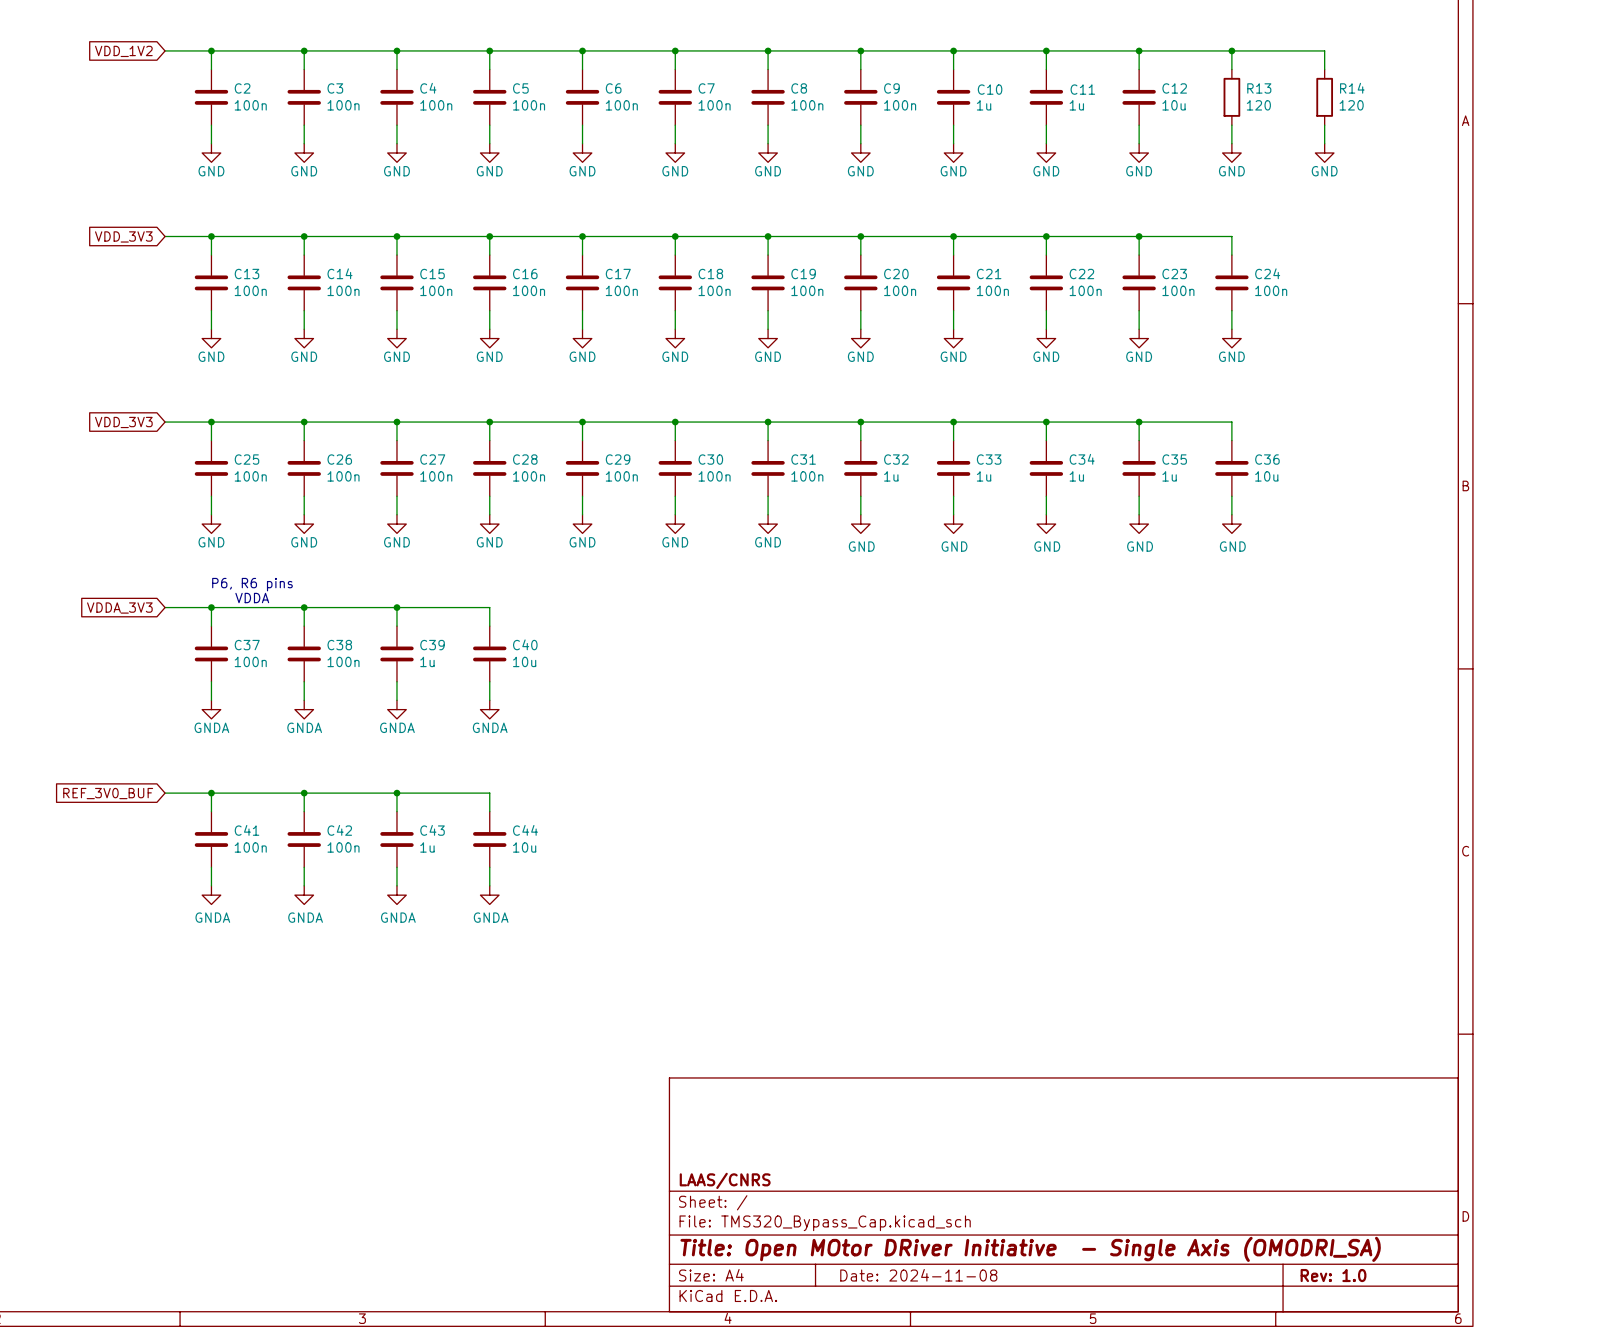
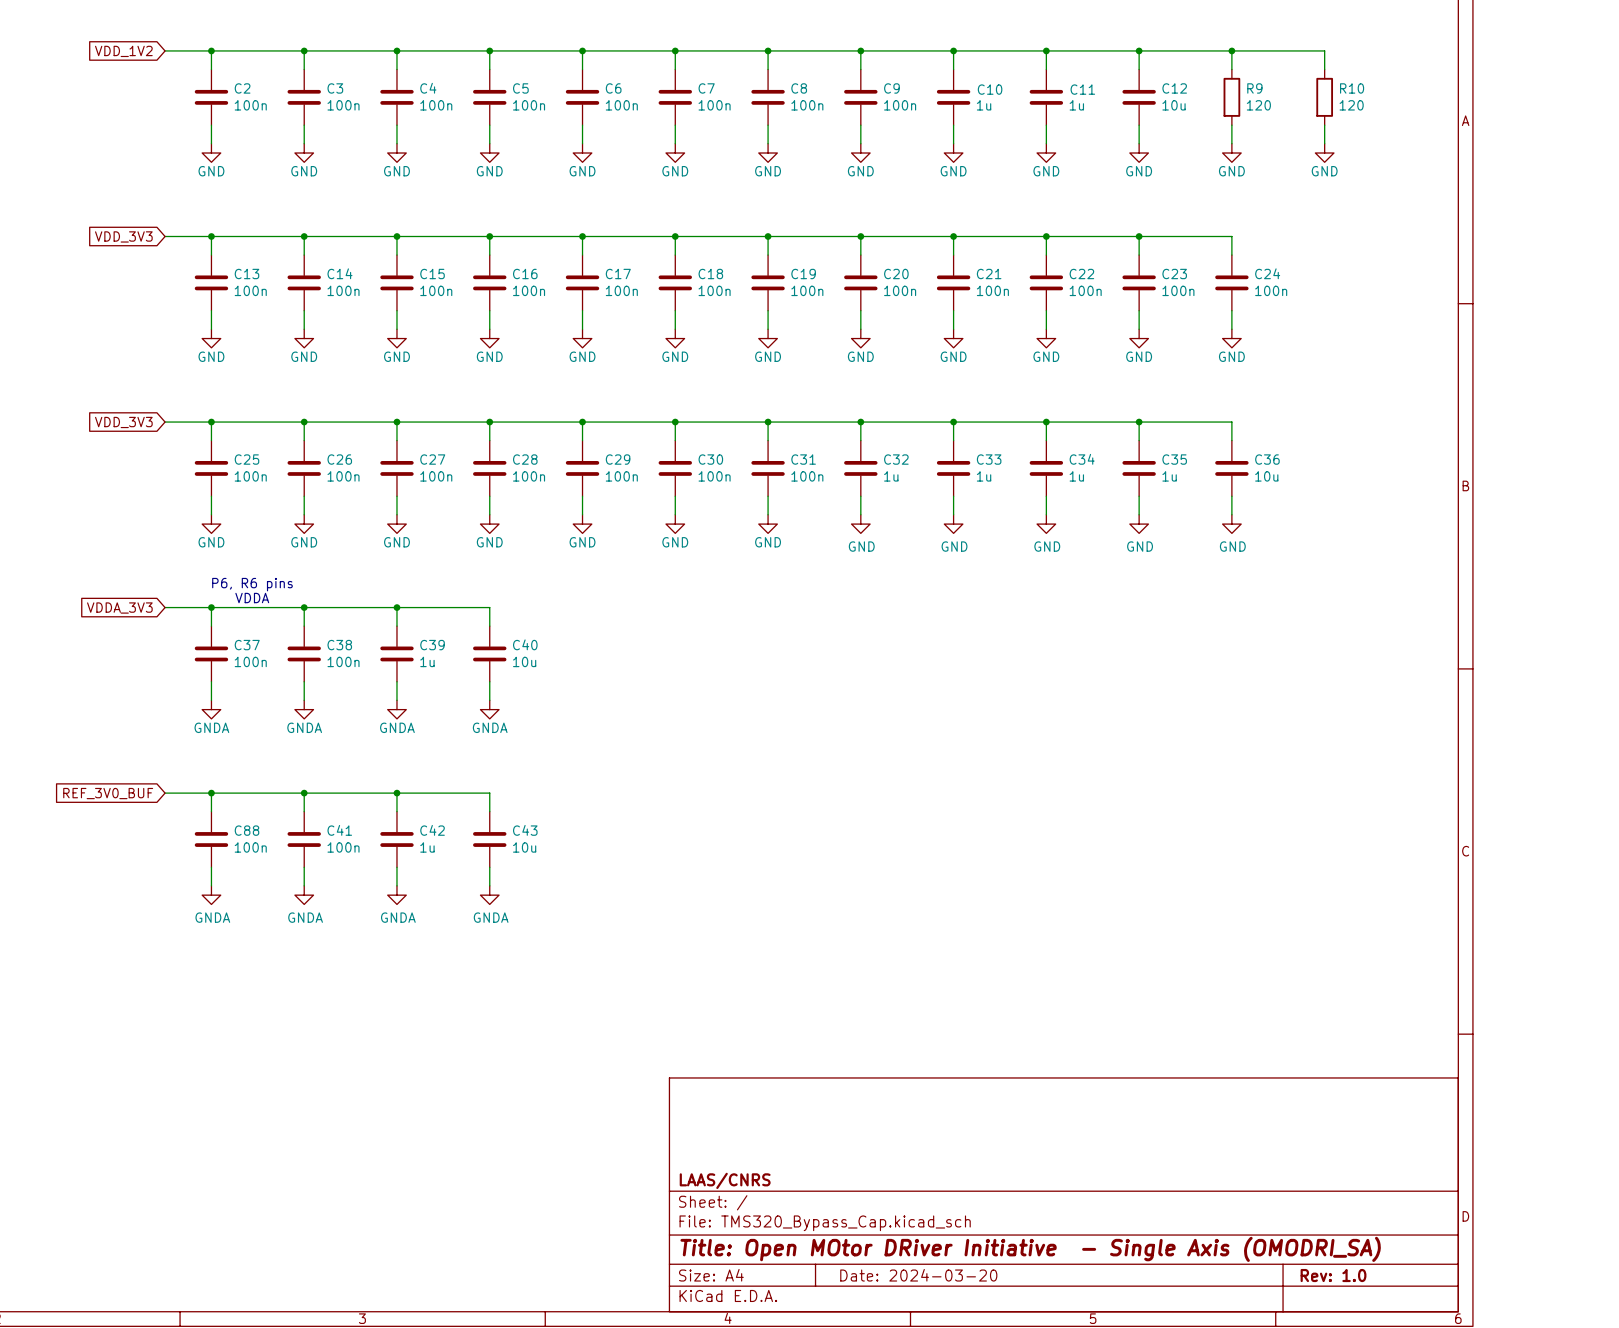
R13 name: R13 (1259, 88) -> R9 (1254, 88)
R14 name: R14 (1352, 88) -> R10 (1352, 88)
C41 name: C41 (246, 830) -> C88 (246, 830)
C42 name: C42 (339, 830) -> C41 (339, 830)
C43 name: C43 (432, 830) -> C42 (432, 830)
C44 name: C44 (525, 830) -> C43 (525, 830)
title block: Date: 2024-11-08 (918, 1275) -> Date: 2024-03-20 (918, 1275)

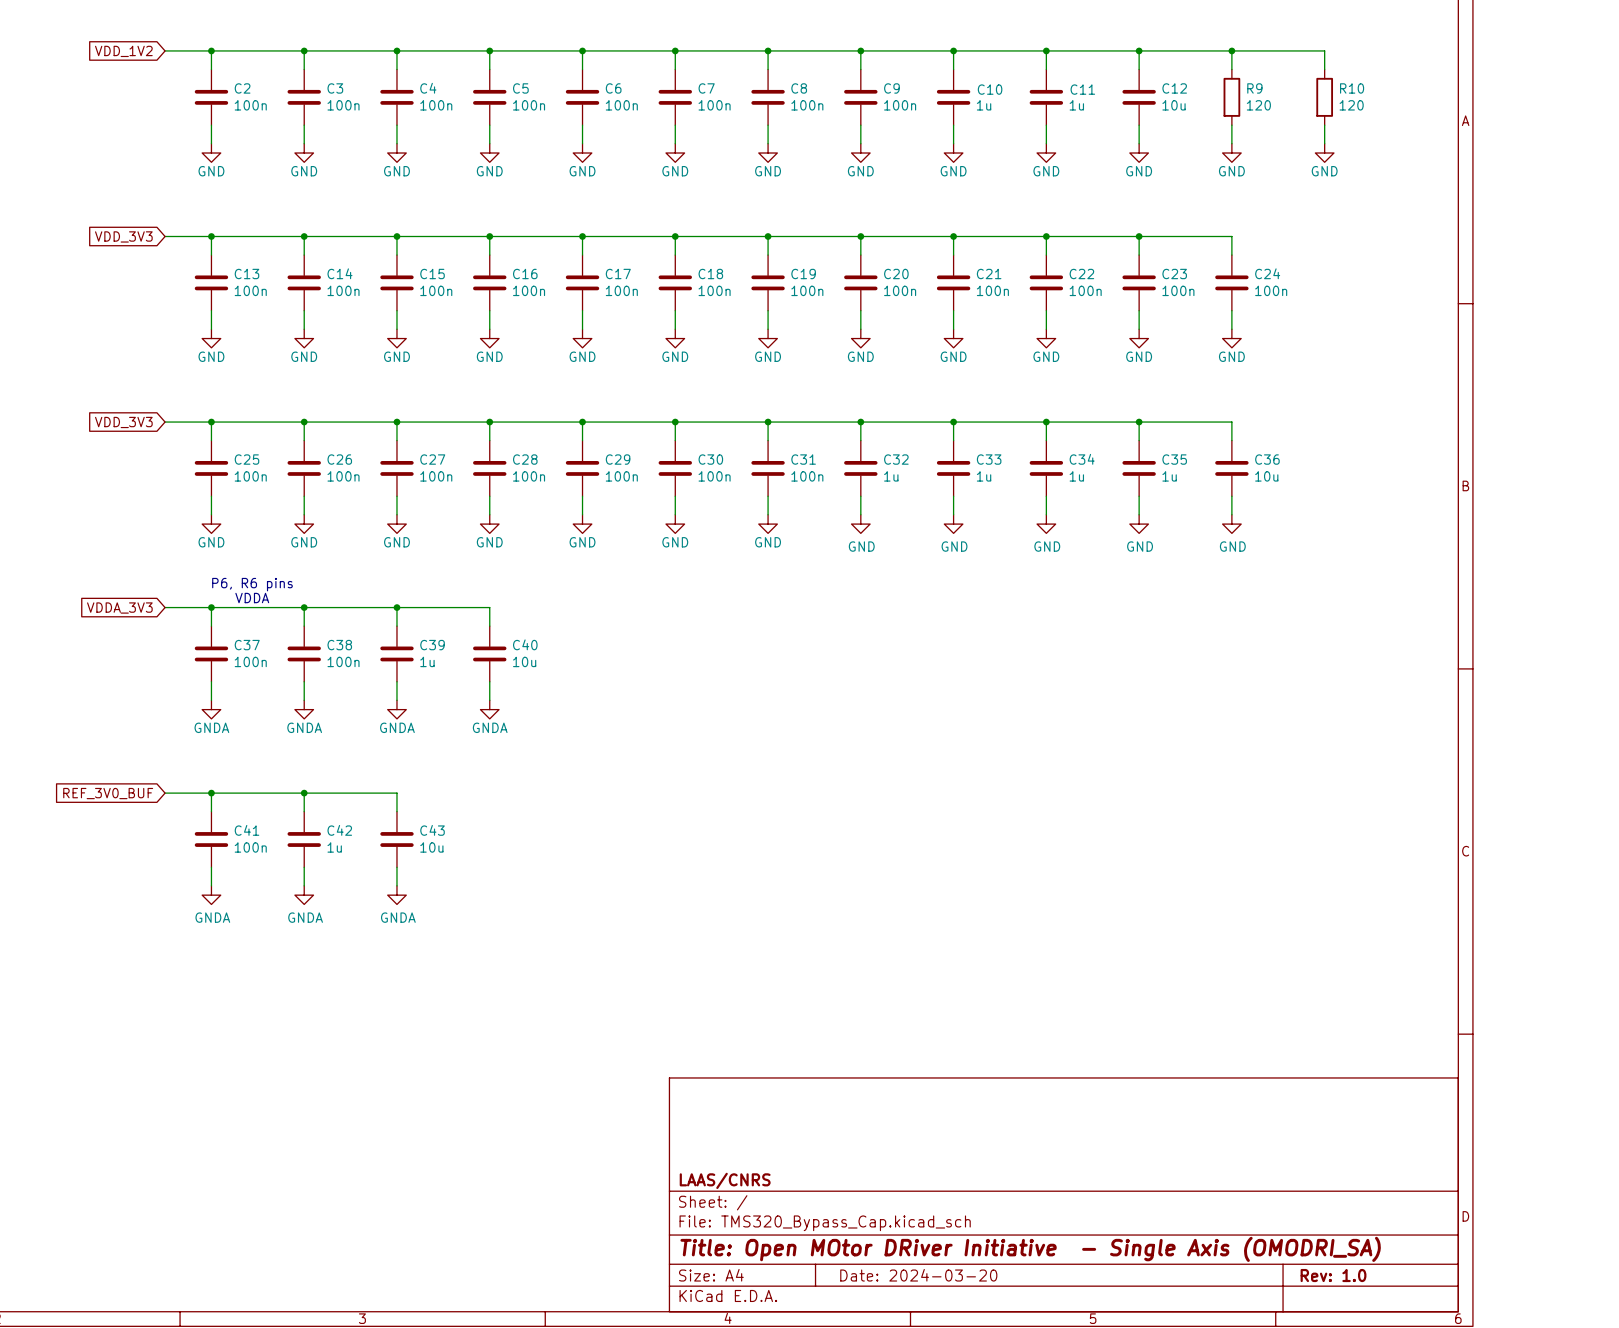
wire: (396, 793) (489, 793) (489, 811) -> none
junction: (396, 793) -> none
C88 name: C88 (246, 830) -> C41 (246, 830)
C41 name: C41 (339, 830) -> C42 (339, 830)
C42 name: C42 (432, 830) -> C43 (432, 830)
C43: 10u (489, 839) -> none
C41 value: 100n (343, 847) -> 1u (334, 847)
C42 value: 1u (427, 847) -> 10u (431, 847)
wire: (489, 867) (489, 885) -> none
power symbol: GNDA (489, 895) -> none

